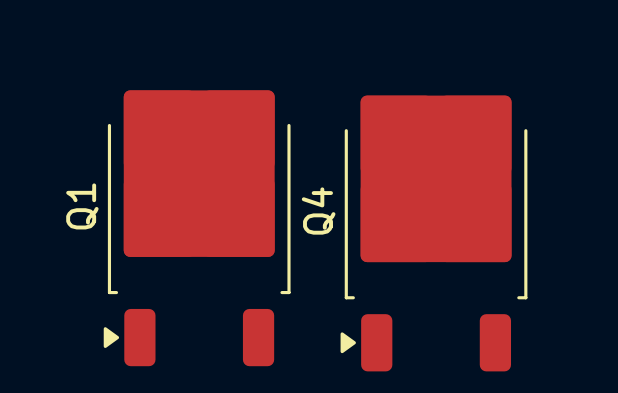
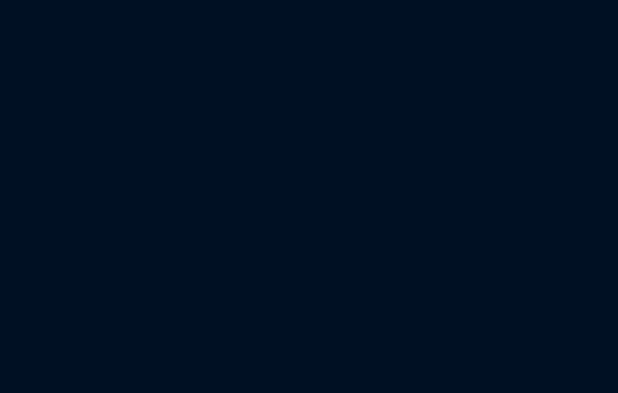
Q1: (197, 228) -> none
Q4: (433, 233) -> none

